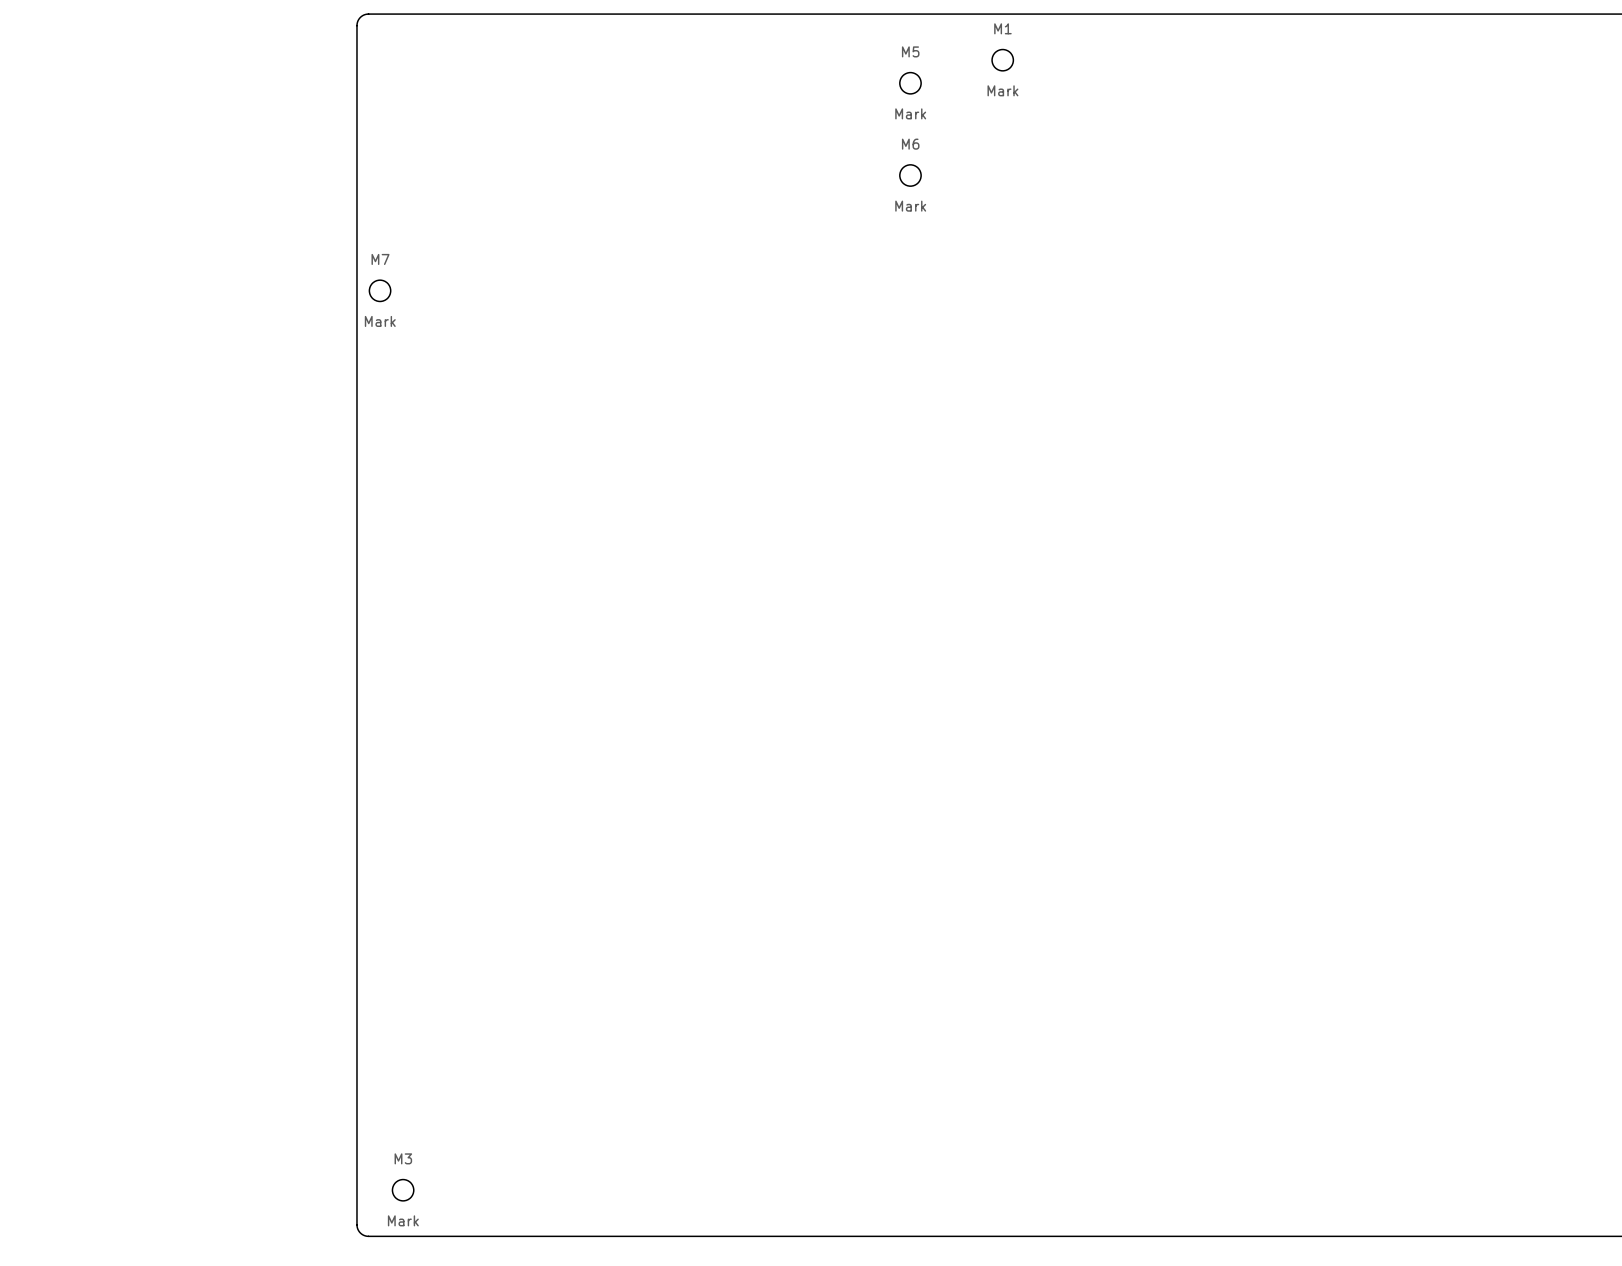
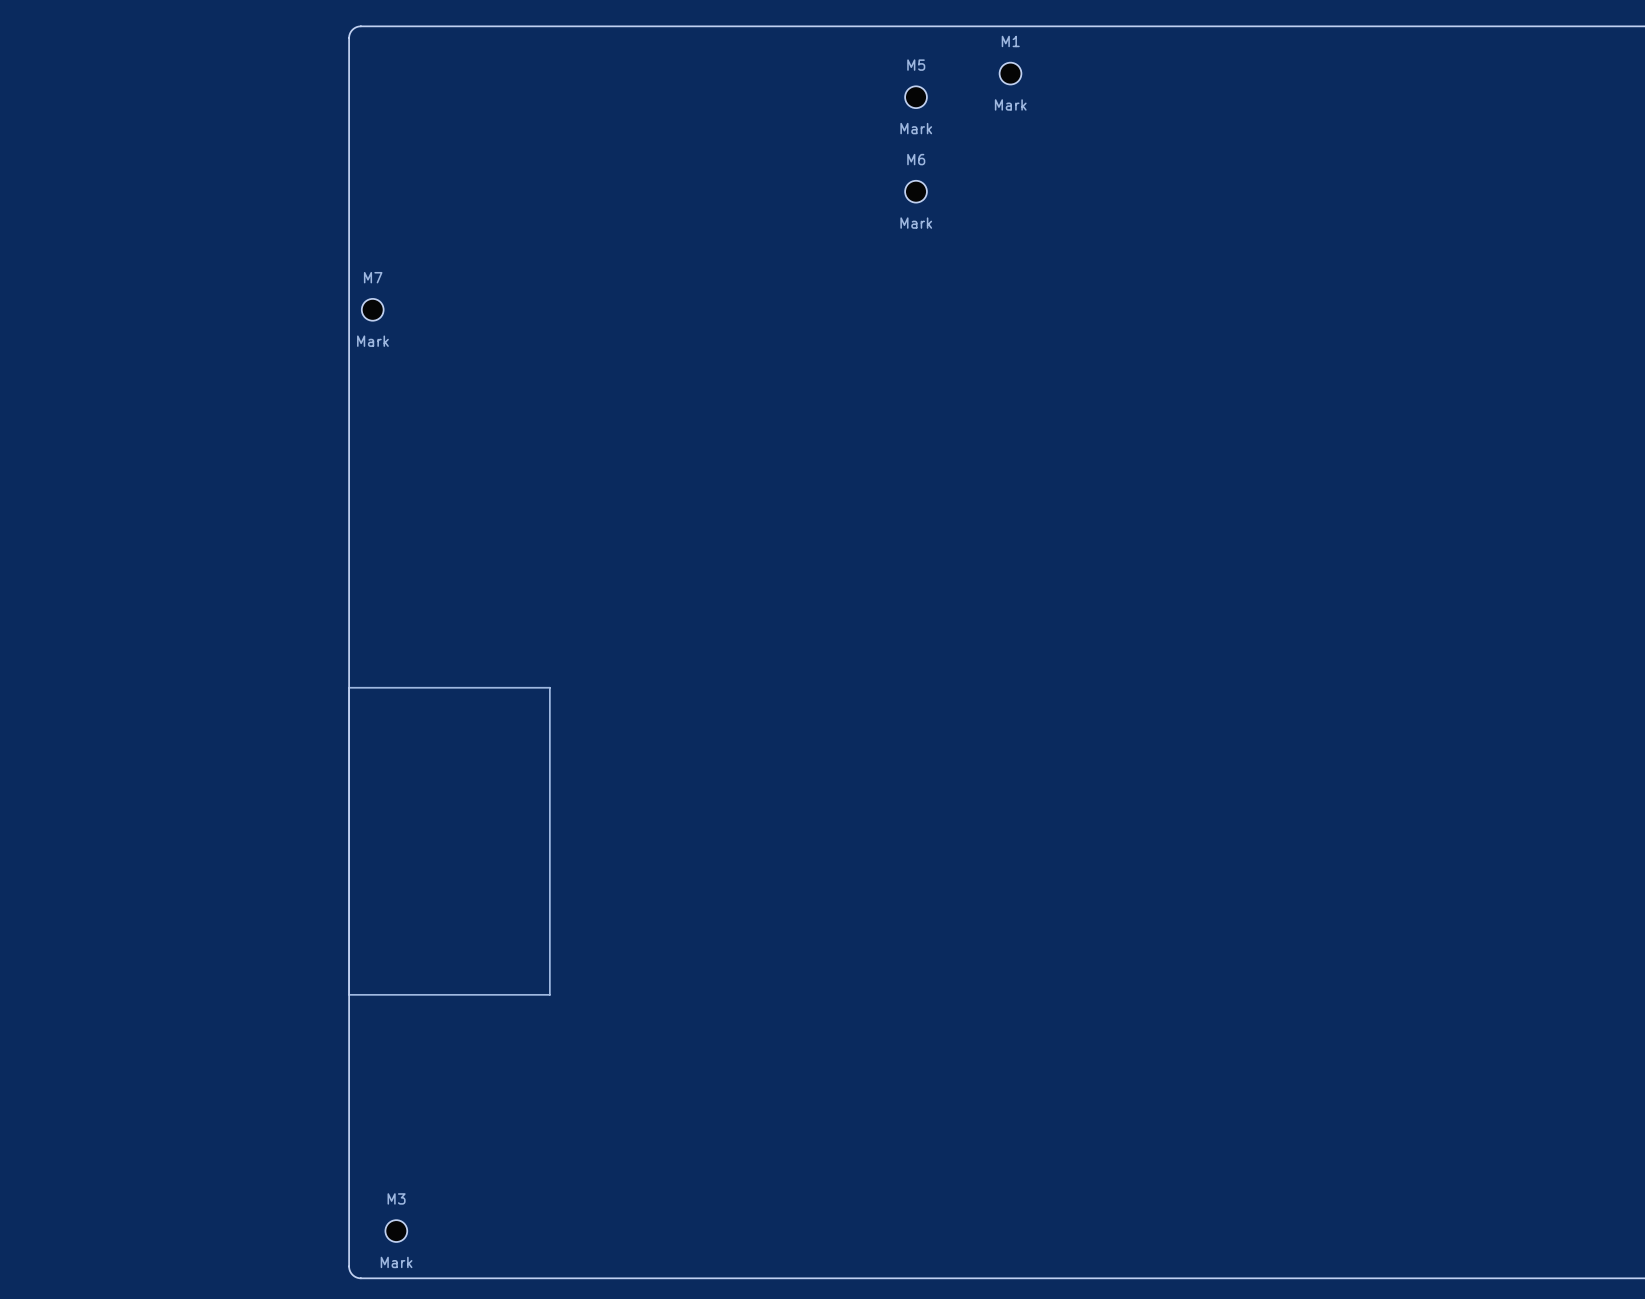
line: none -> (349, 687) (549, 687) (549, 994) (349, 994) (349, 687)

